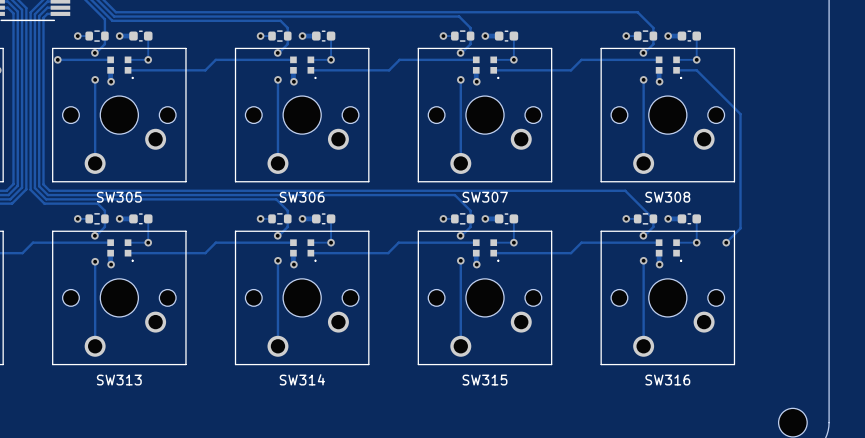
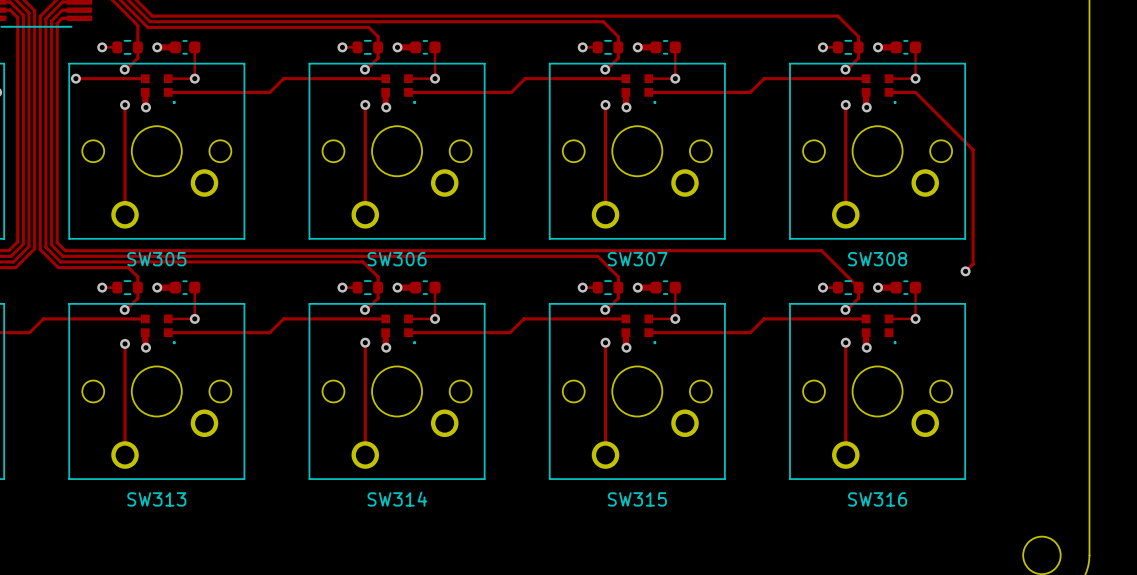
track: (740, 200) (740, 228) (726, 242) -> (973, 263) (965, 271)
via position: (726, 242) -> (965, 271)

